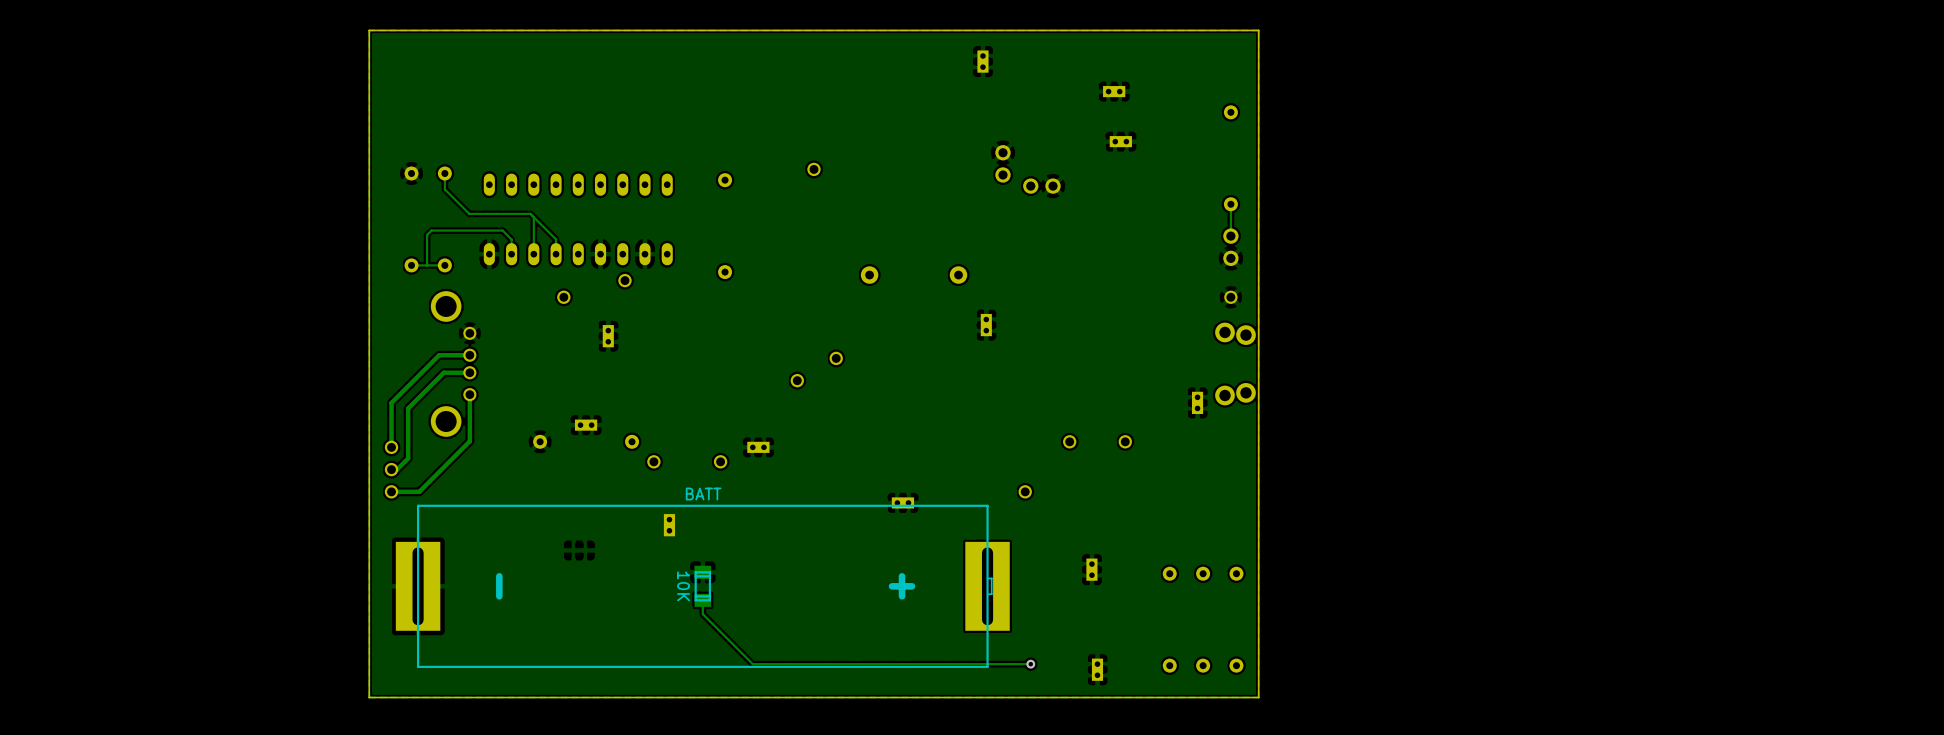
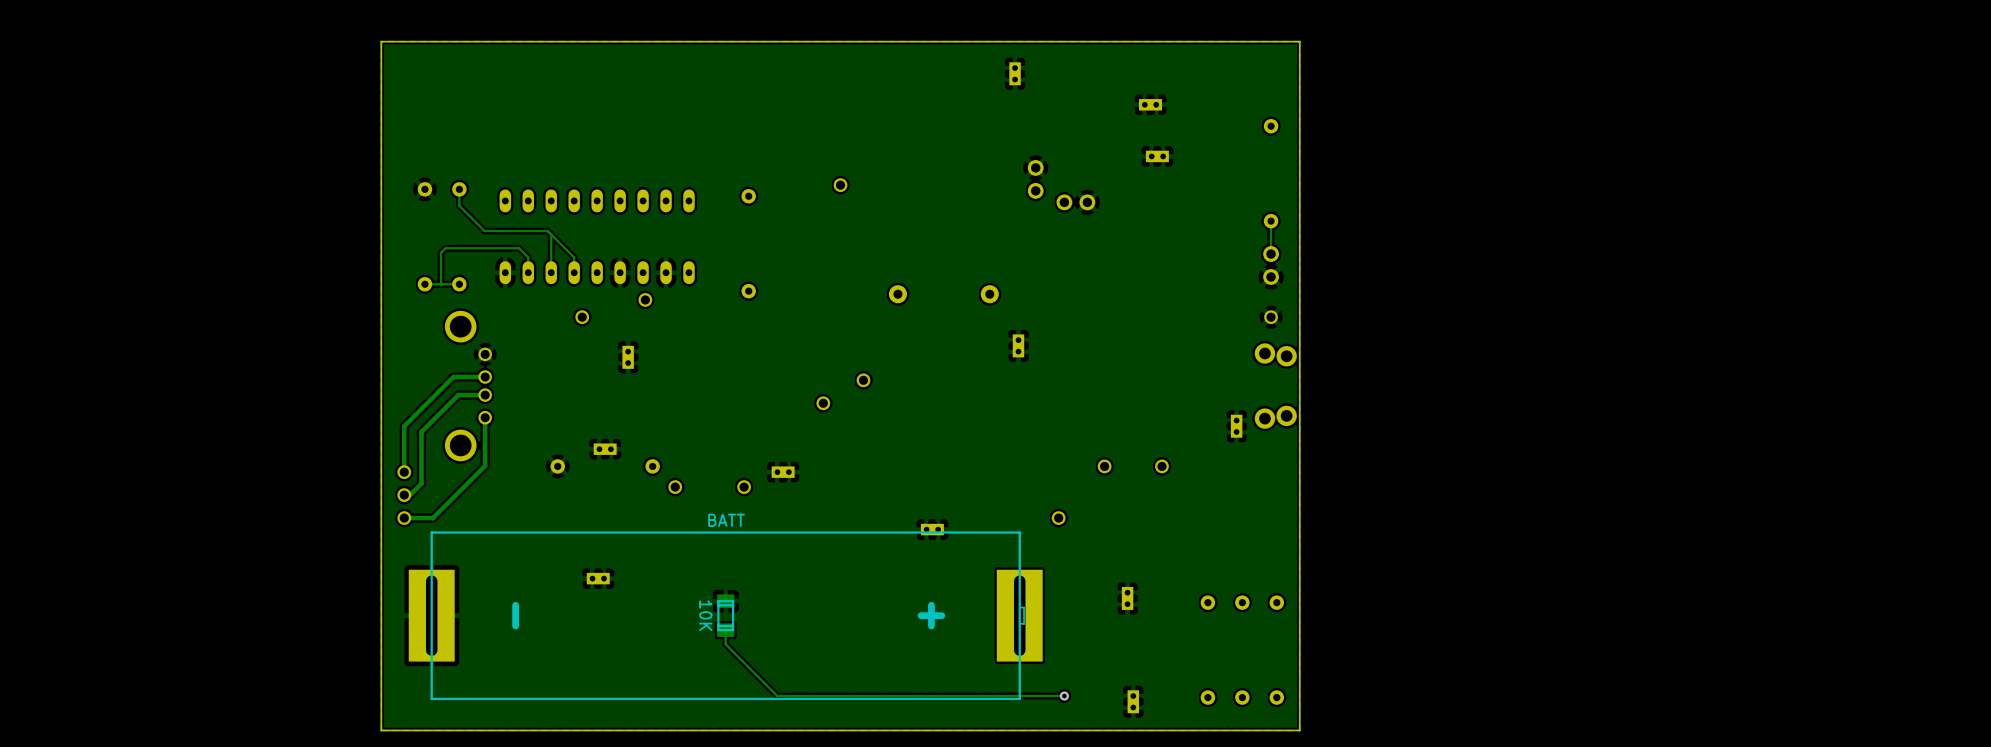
part rotation: 0° (669, 525) -> 90° clockwise (598, 578)
part position: (669, 525) -> (598, 578)

